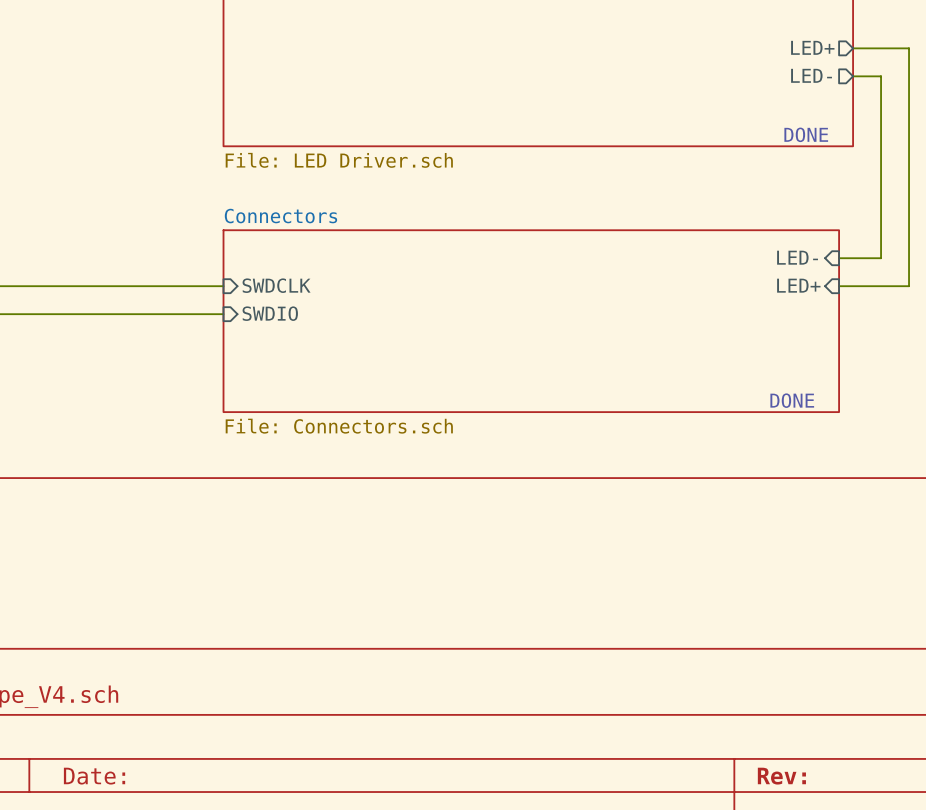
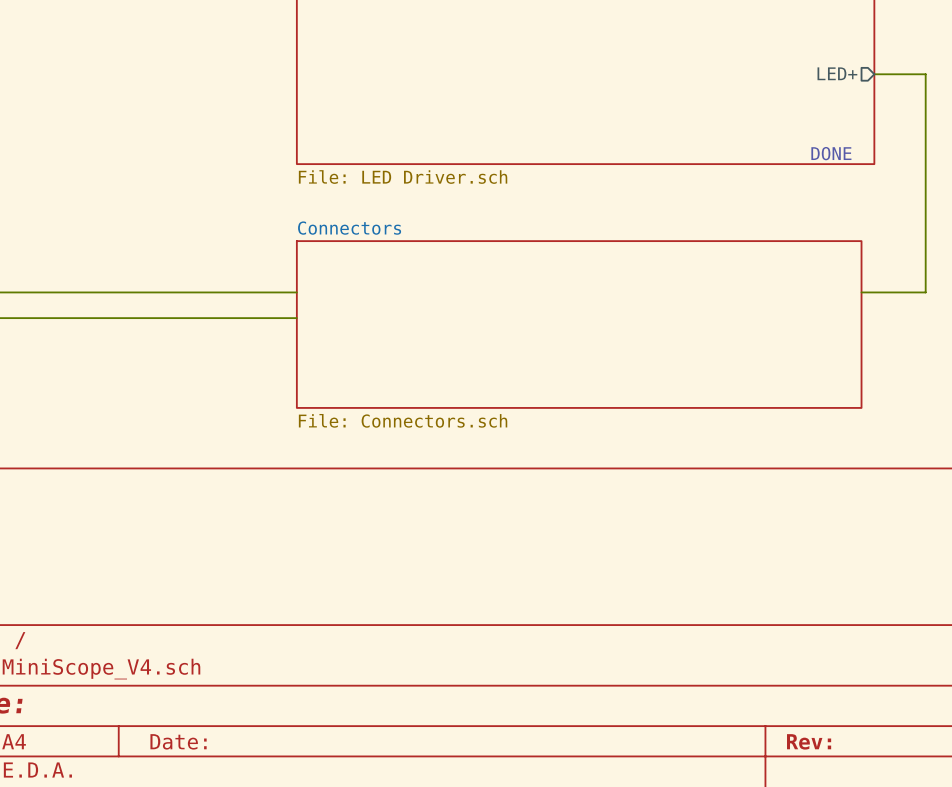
sheet pin: LED- (811, 75) -> none
wire: (853, 76) (881, 76) (881, 258) (839, 258) -> none
sheet pin: LED- (797, 257) -> none
sheet pin: SWDCLK (276, 285) -> none
sheet pin: LED+ (798, 285) -> none
sheet pin: SWDIO (270, 313) -> none
text: DONE (792, 400) -> none

